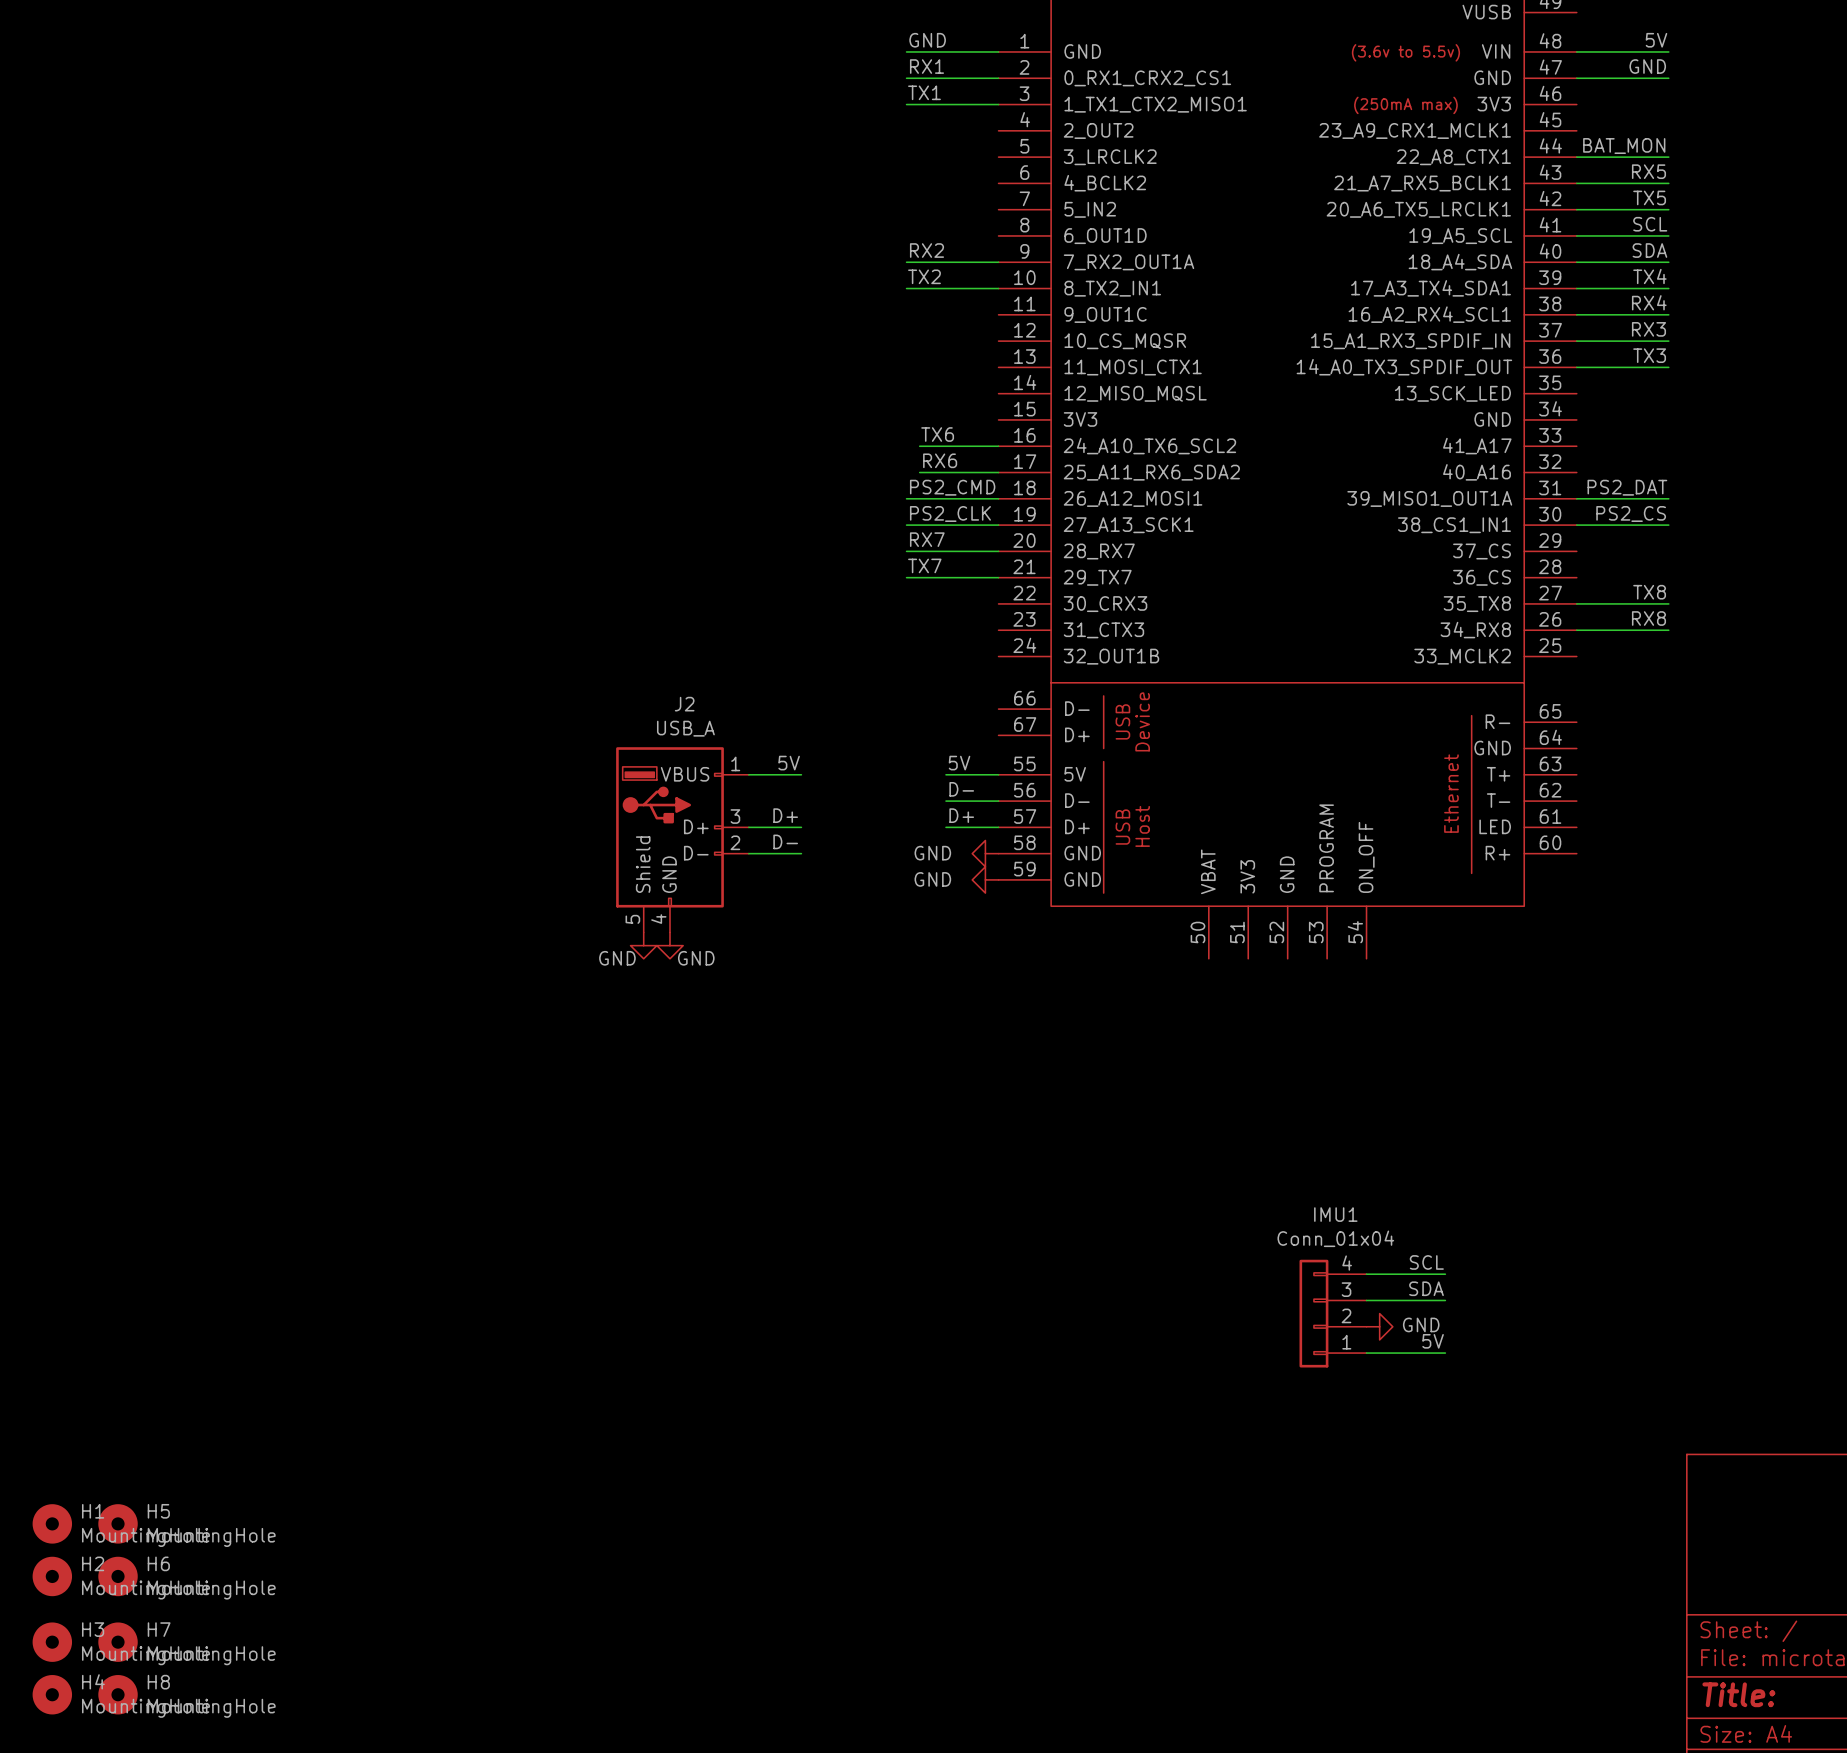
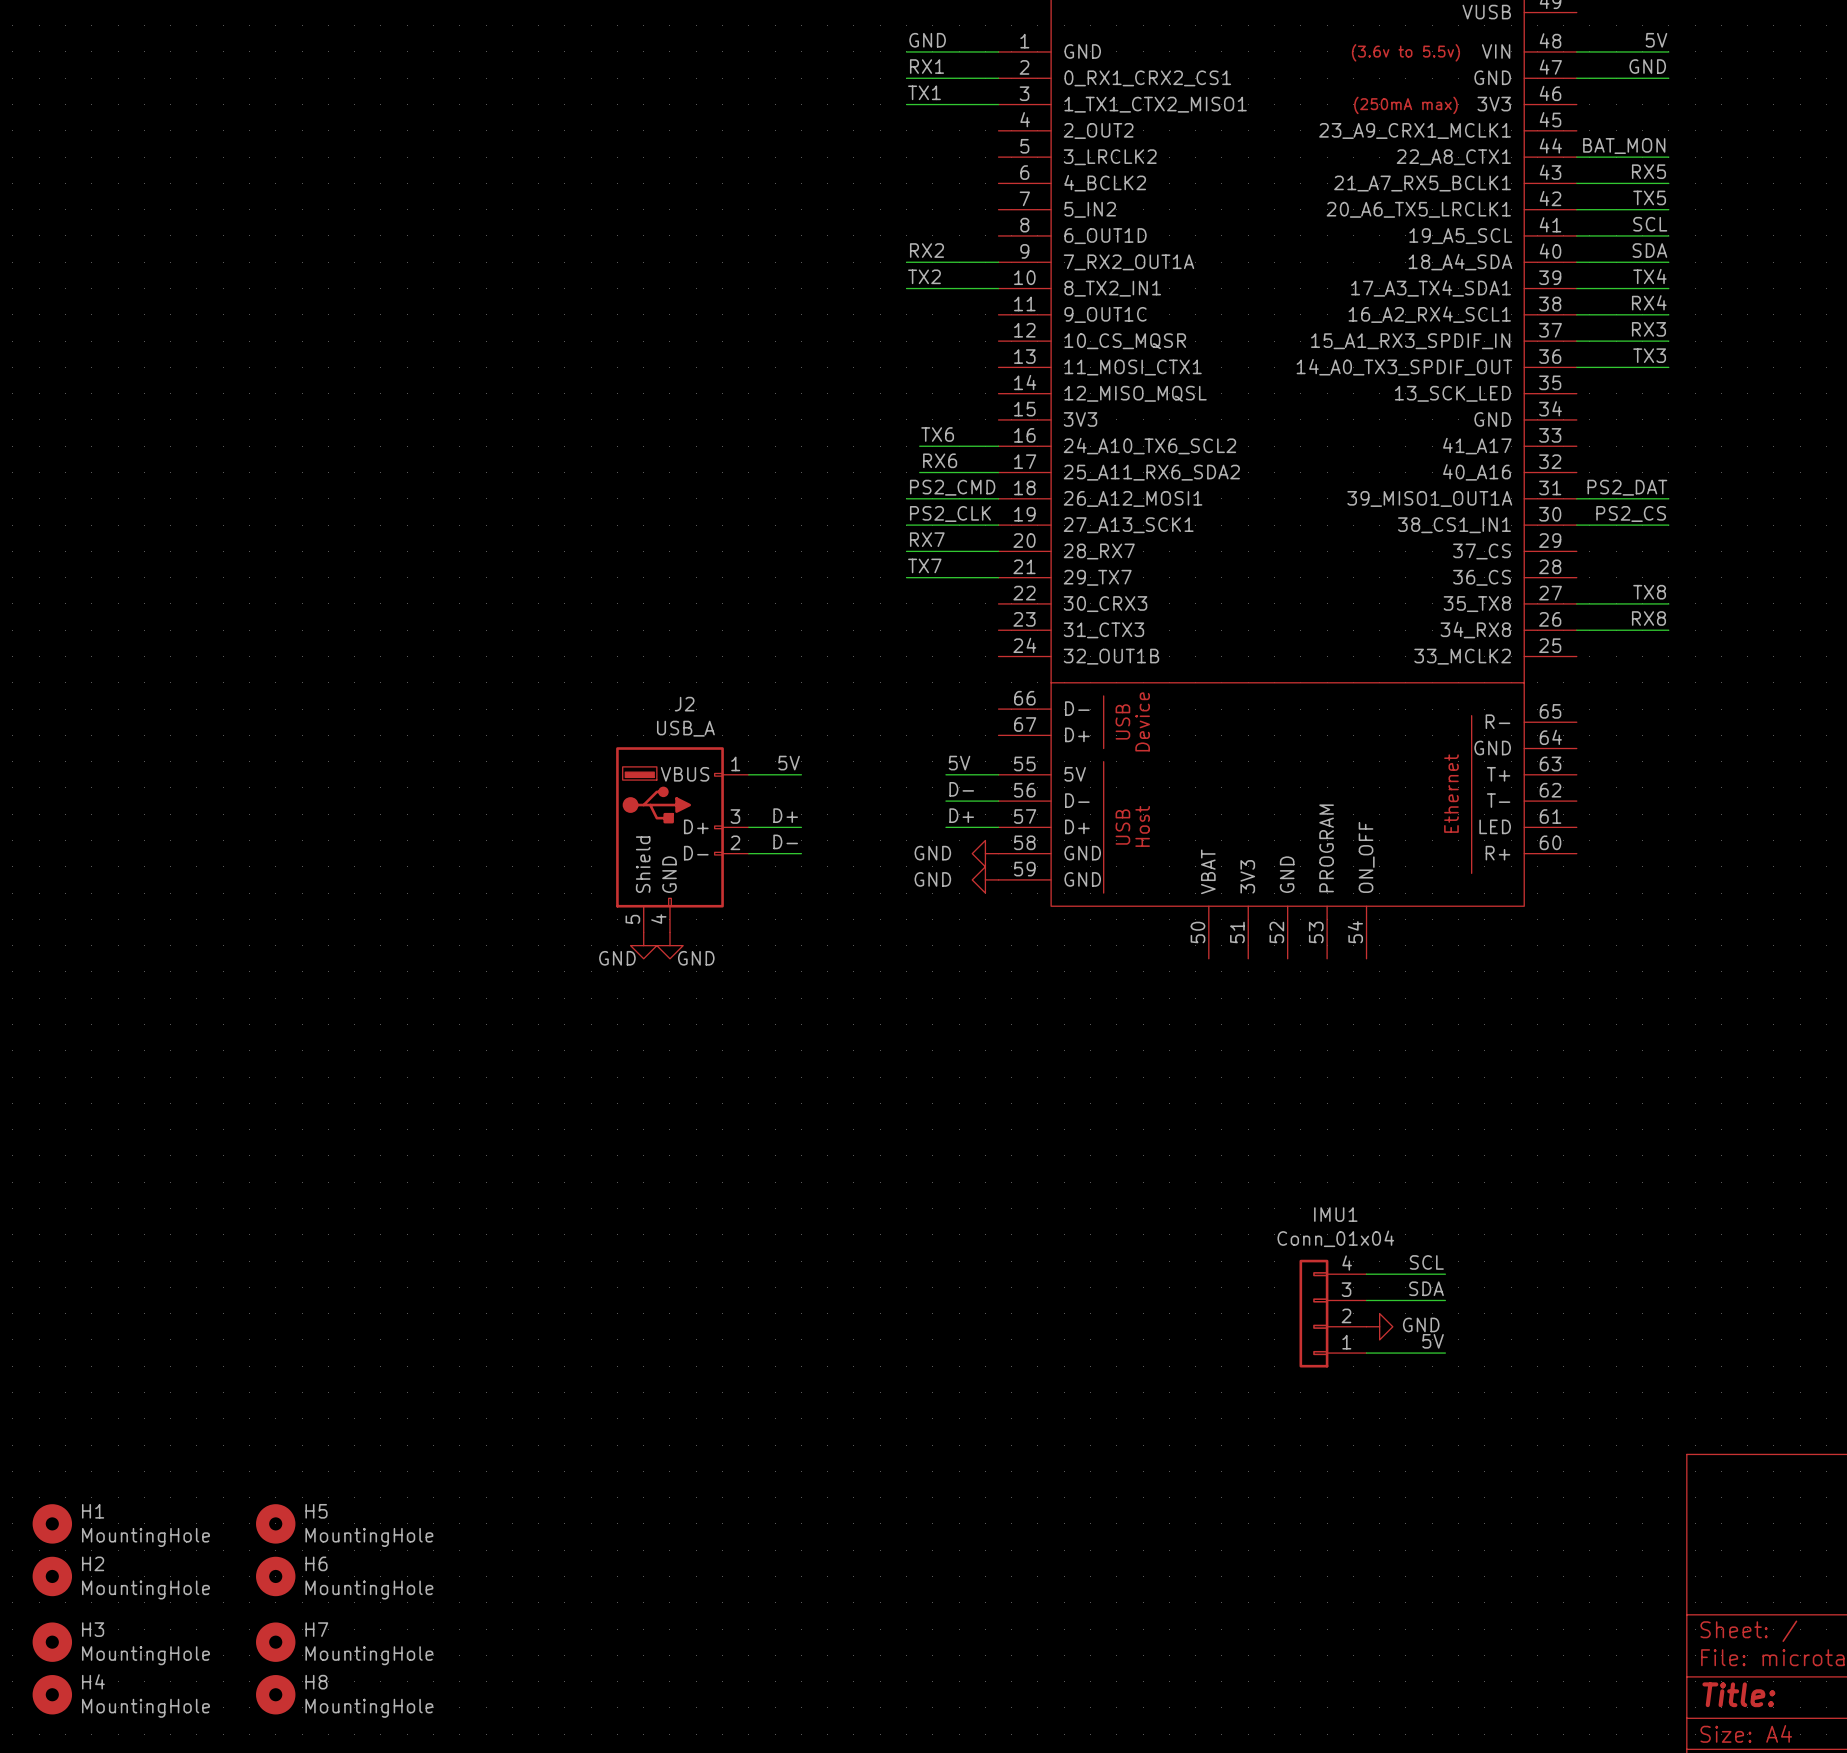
H5 position: (118, 1523) -> (275, 1523)
H6 position: (118, 1576) -> (275, 1576)
H7 position: (118, 1642) -> (275, 1642)
H8 position: (118, 1694) -> (275, 1694)

